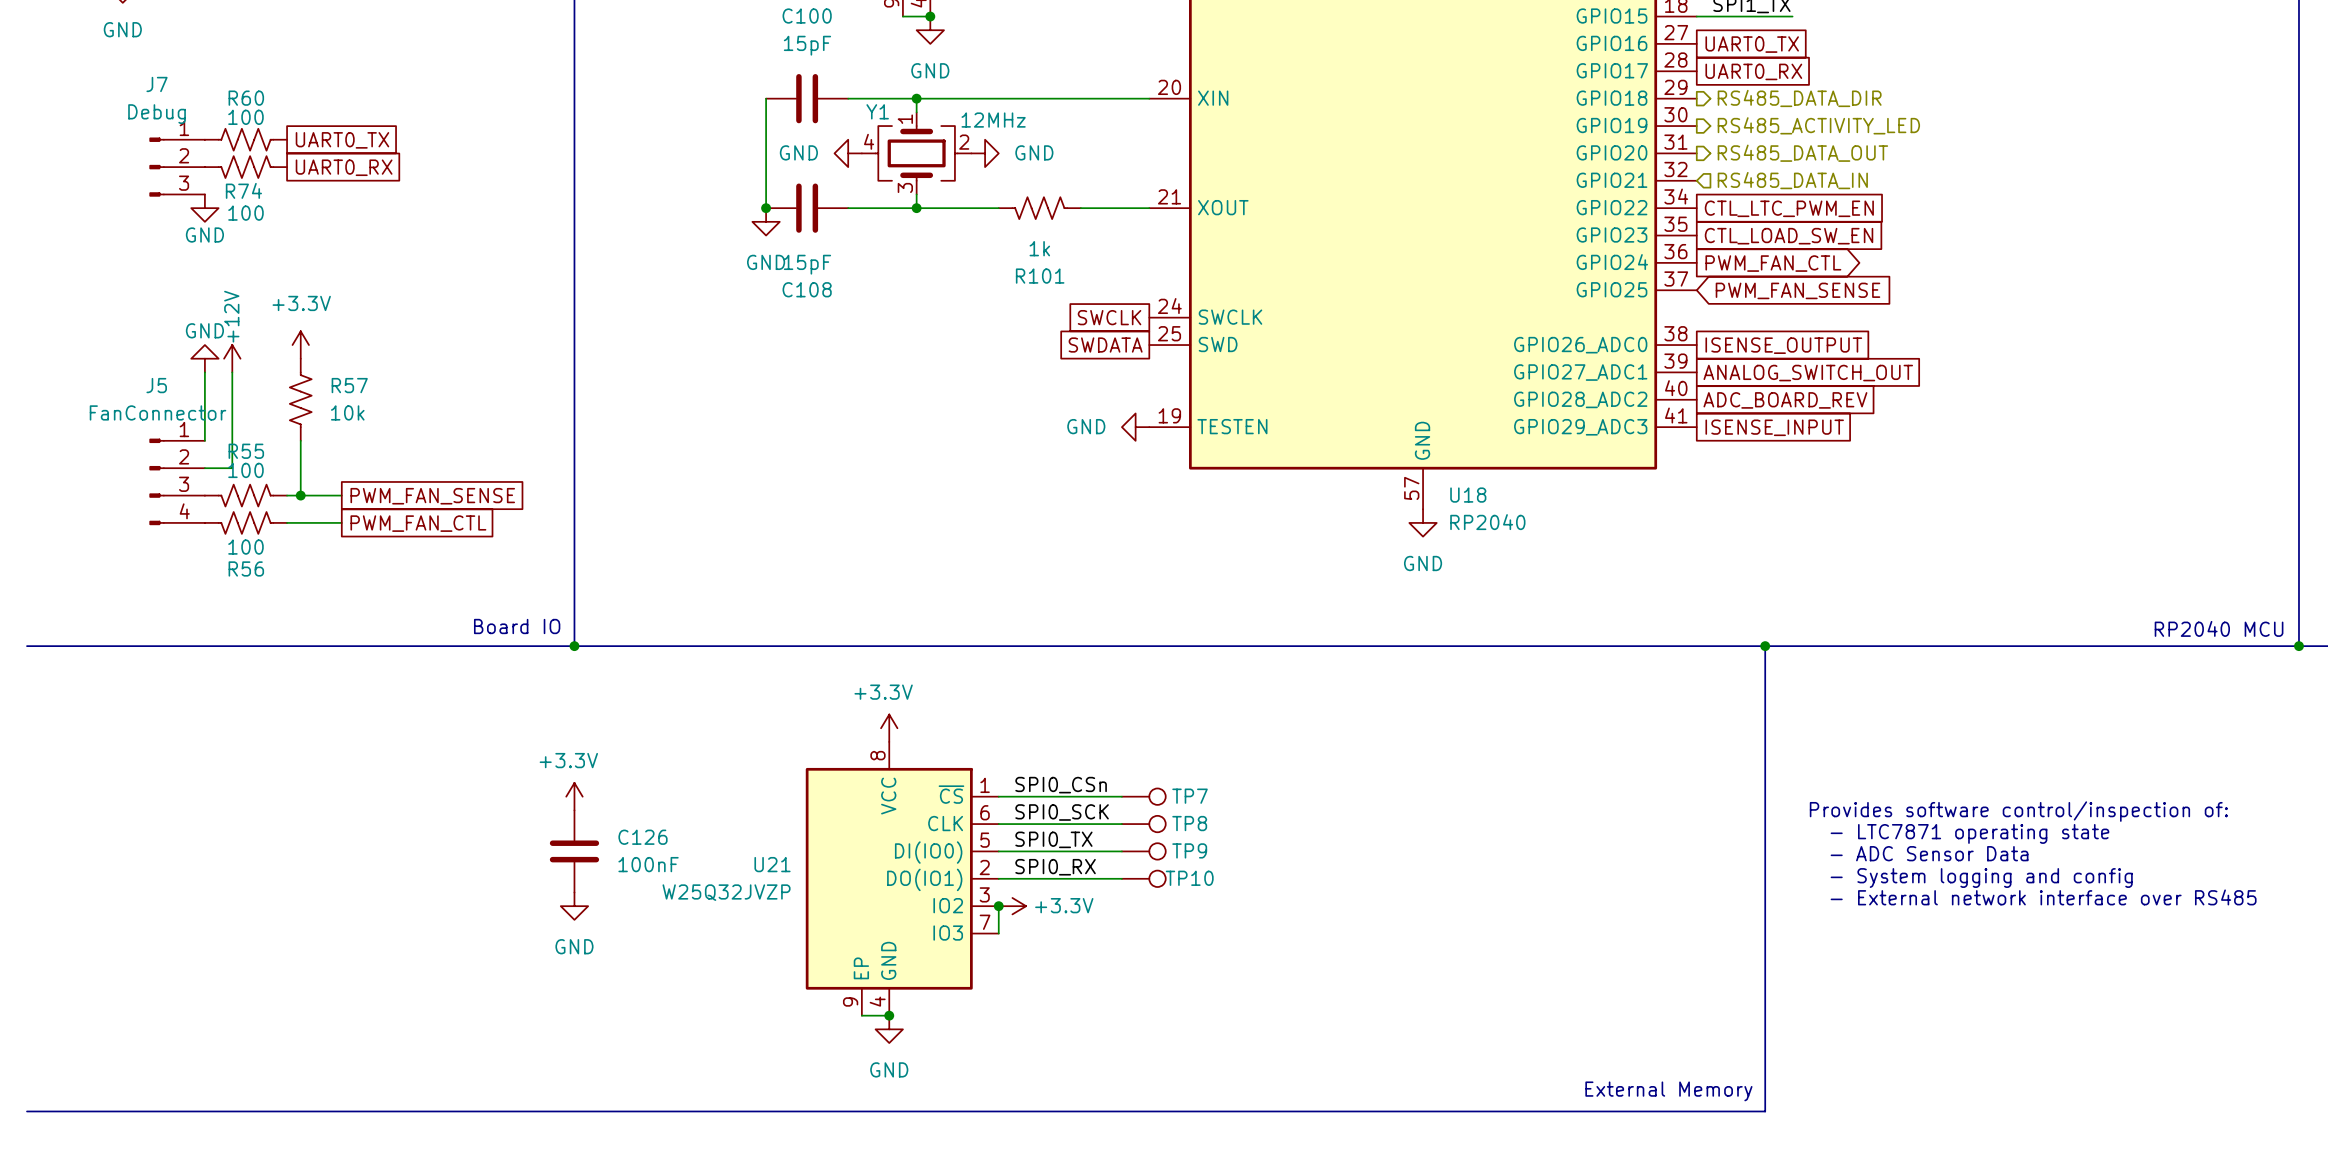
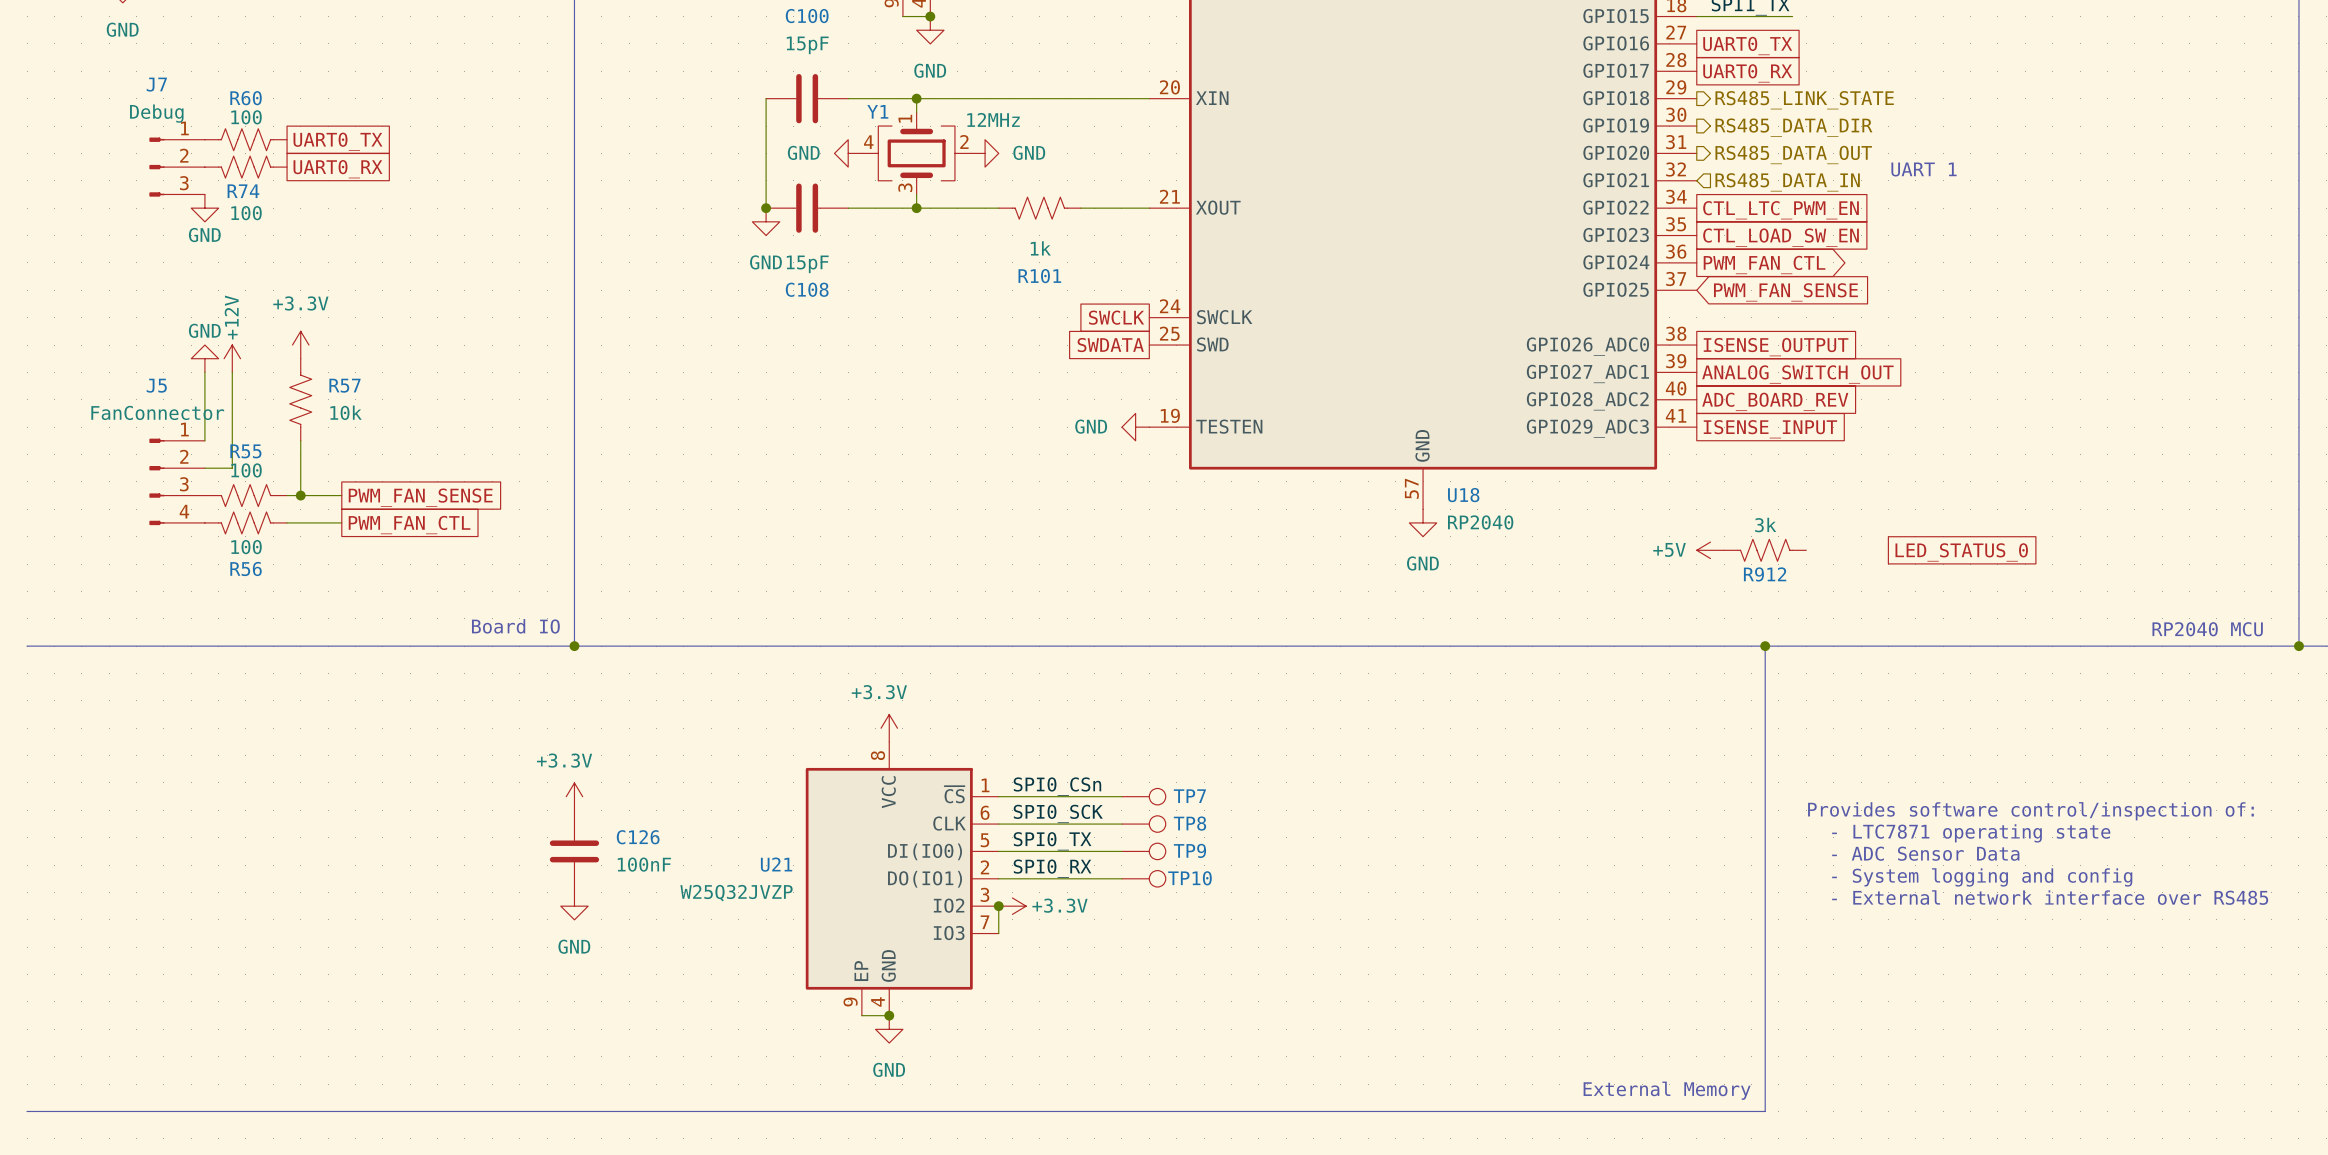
hierarchical label: RS485_DATA_DIR (1799, 98) -> RS485_LINK_STATE (1804, 100)
hierarchical label: RS485_ACTIVITY_LED (1818, 125) -> RS485_DATA_DIR (1793, 127)
text: none -> UART 1 (1924, 169)
power symbol: none -> +5V (1710, 550)
R912: none -> 3k (1765, 550)
global label: none -> LED_STATUS_0 (1961, 552)

